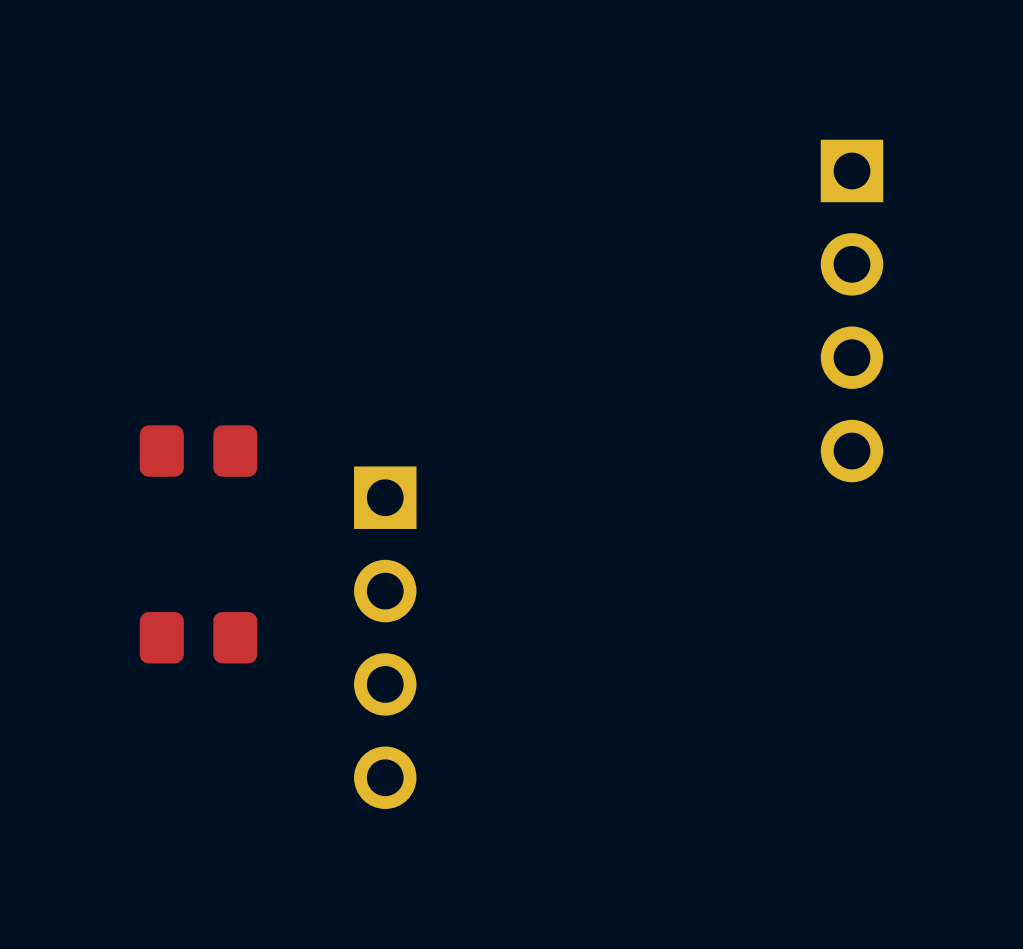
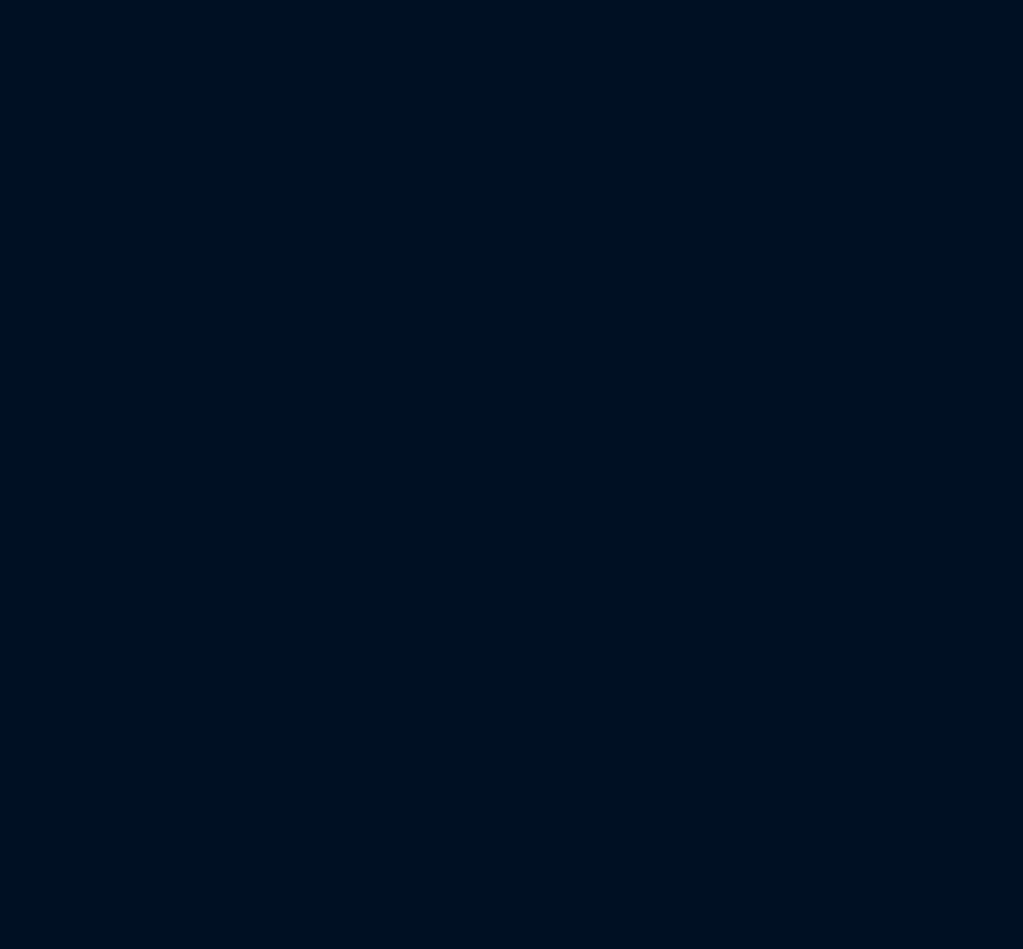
part: (852, 311) -> none
part: (198, 451) -> none
part: (198, 637) -> none
part: (385, 637) -> none

